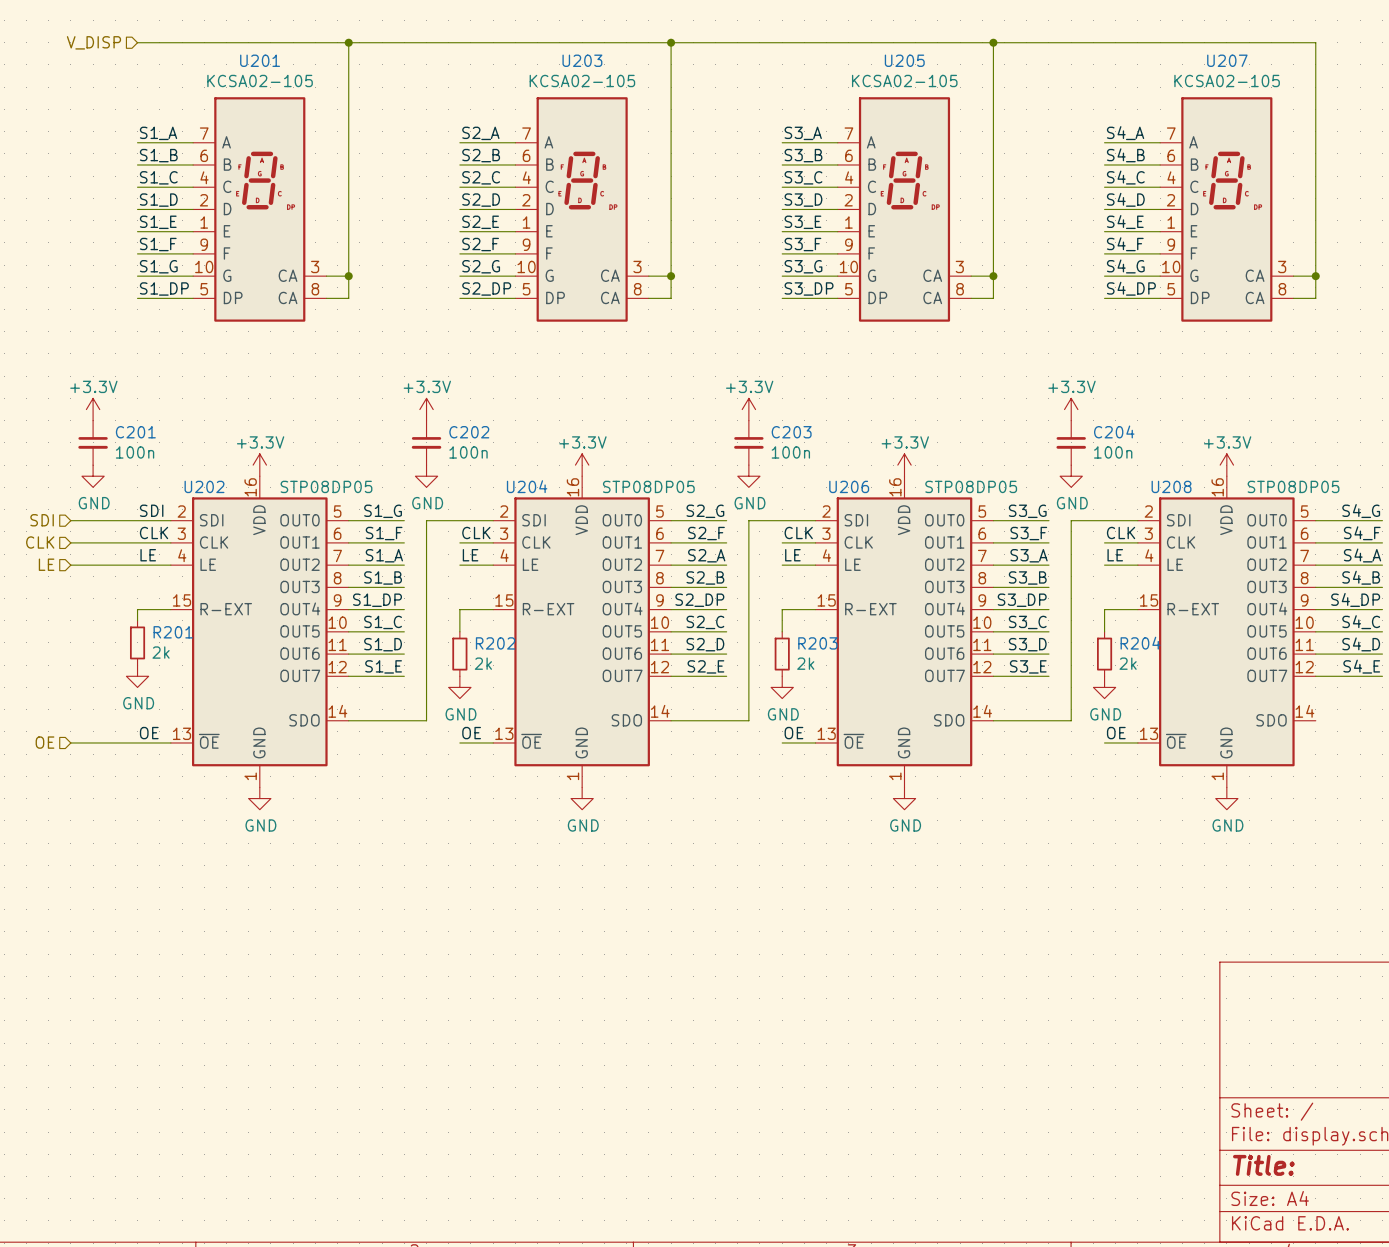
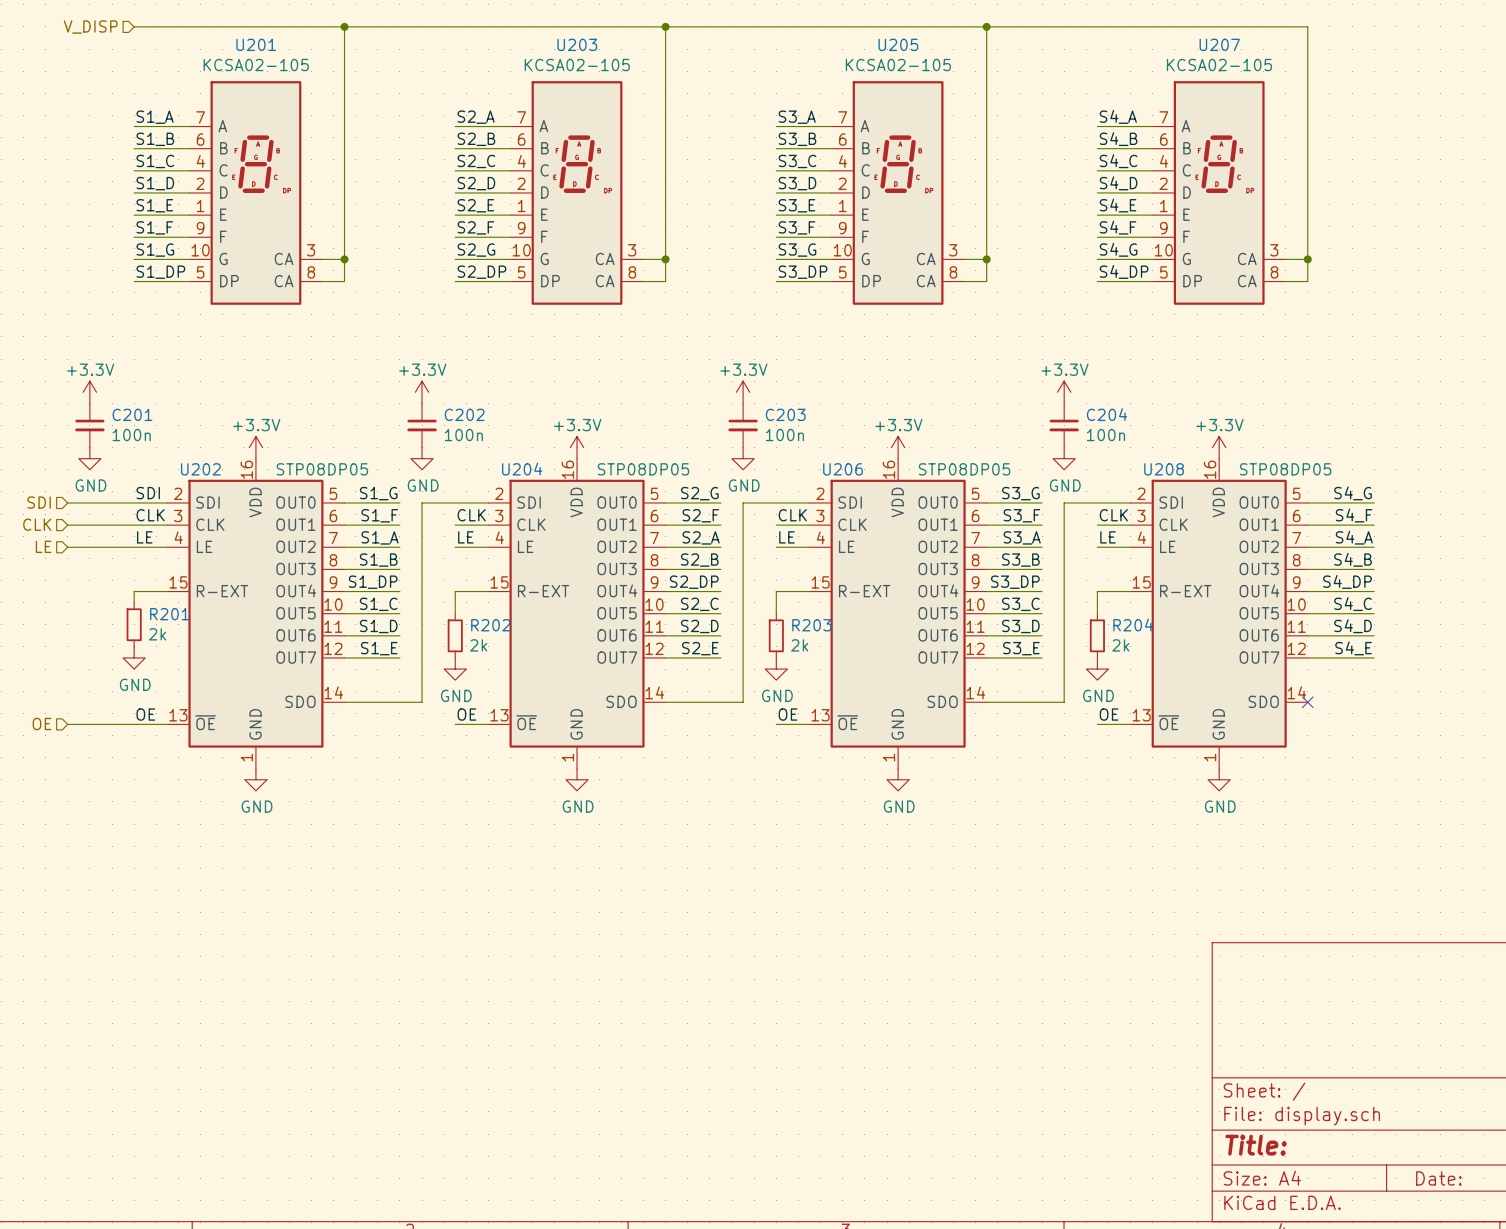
no-connect mark: none -> (1307, 702)

